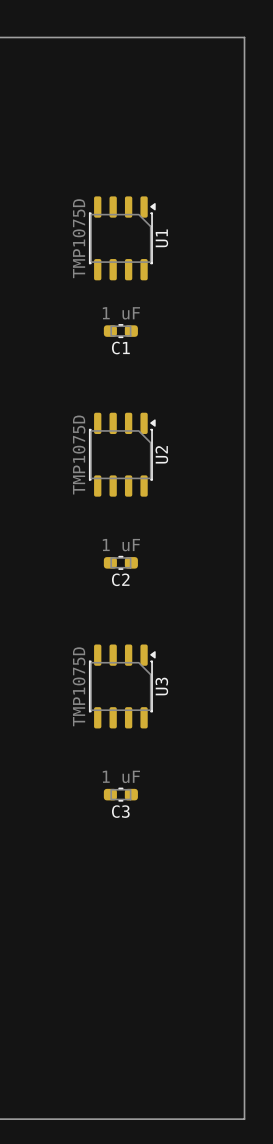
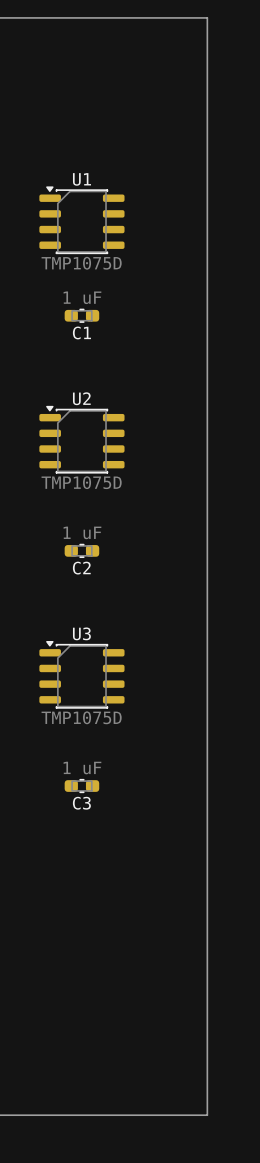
U1 rotation: 0° (122, 238) -> 90° counterclockwise (81, 220)
U2 rotation: 0° (122, 454) -> 90° counterclockwise (81, 439)
U3 rotation: 0° (122, 686) -> 90° counterclockwise (81, 674)

